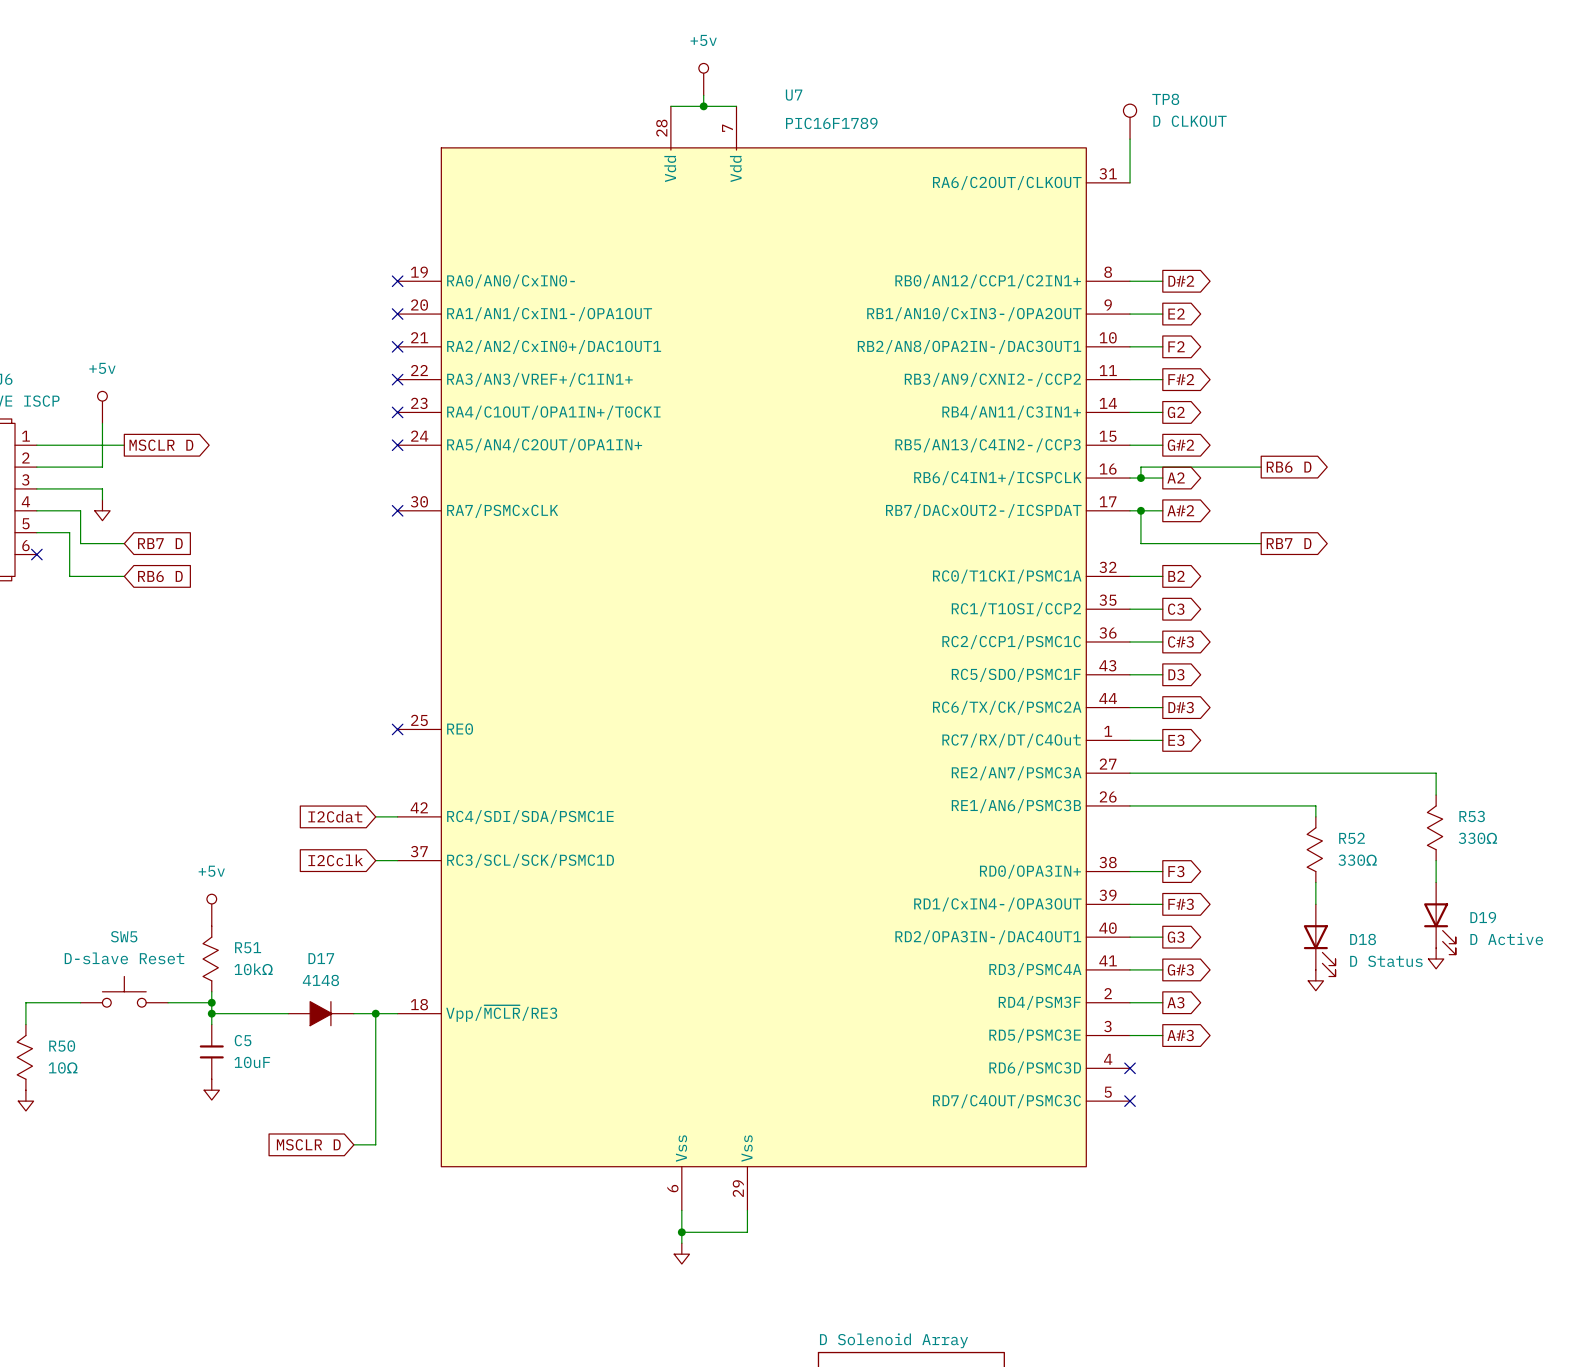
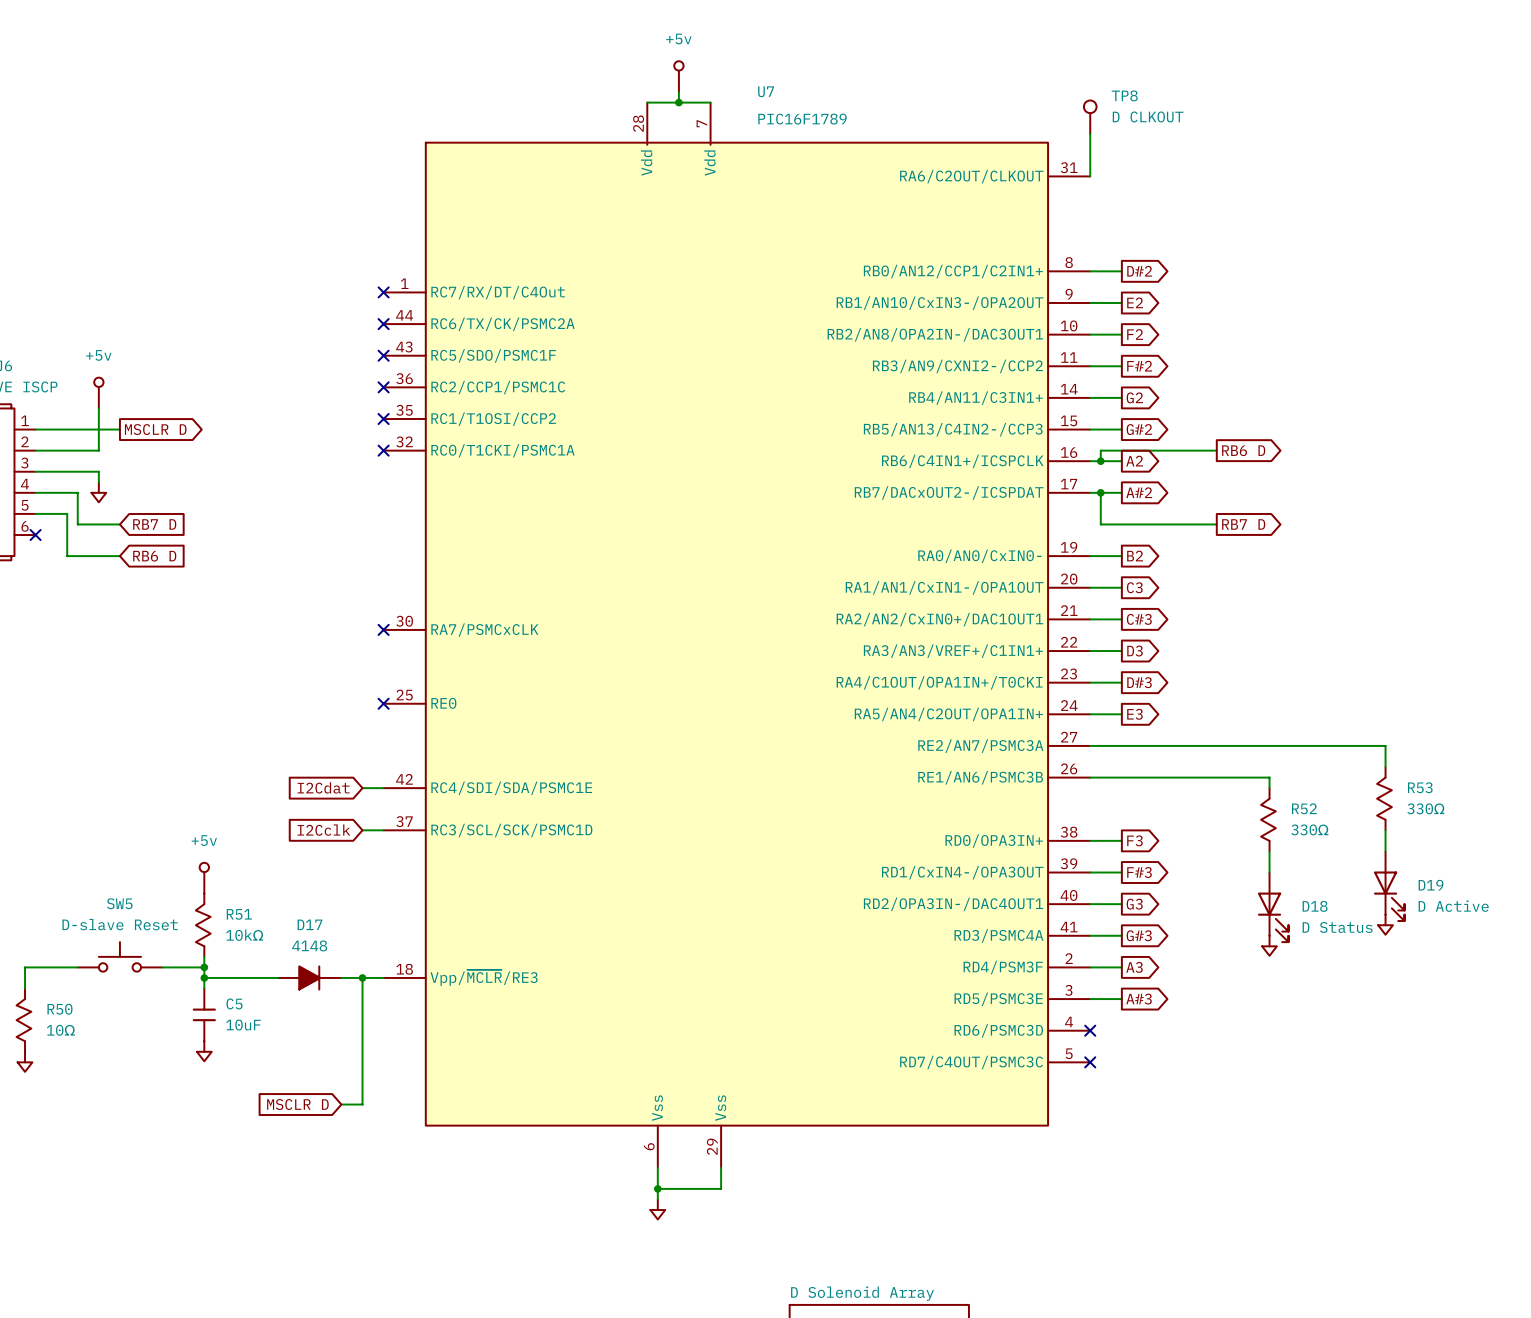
U7 symbol: [397, 106, 1131, 1211] -> [383, 102, 1091, 1168]
no-connect mark: (397, 281) -> none
no-connect mark: none -> (383, 292)
no-connect mark: (397, 314) -> none
no-connect mark: none -> (383, 324)
no-connect mark: (397, 346) -> none
no-connect mark: none -> (383, 355)
no-connect mark: (397, 379) -> none
no-connect mark: none -> (383, 387)
no-connect mark: (397, 412) -> none
no-connect mark: none -> (383, 419)
no-connect mark: (397, 445) -> none
no-connect mark: none -> (383, 450)
no-connect mark: (397, 510) -> none
no-connect mark: none -> (383, 629)

